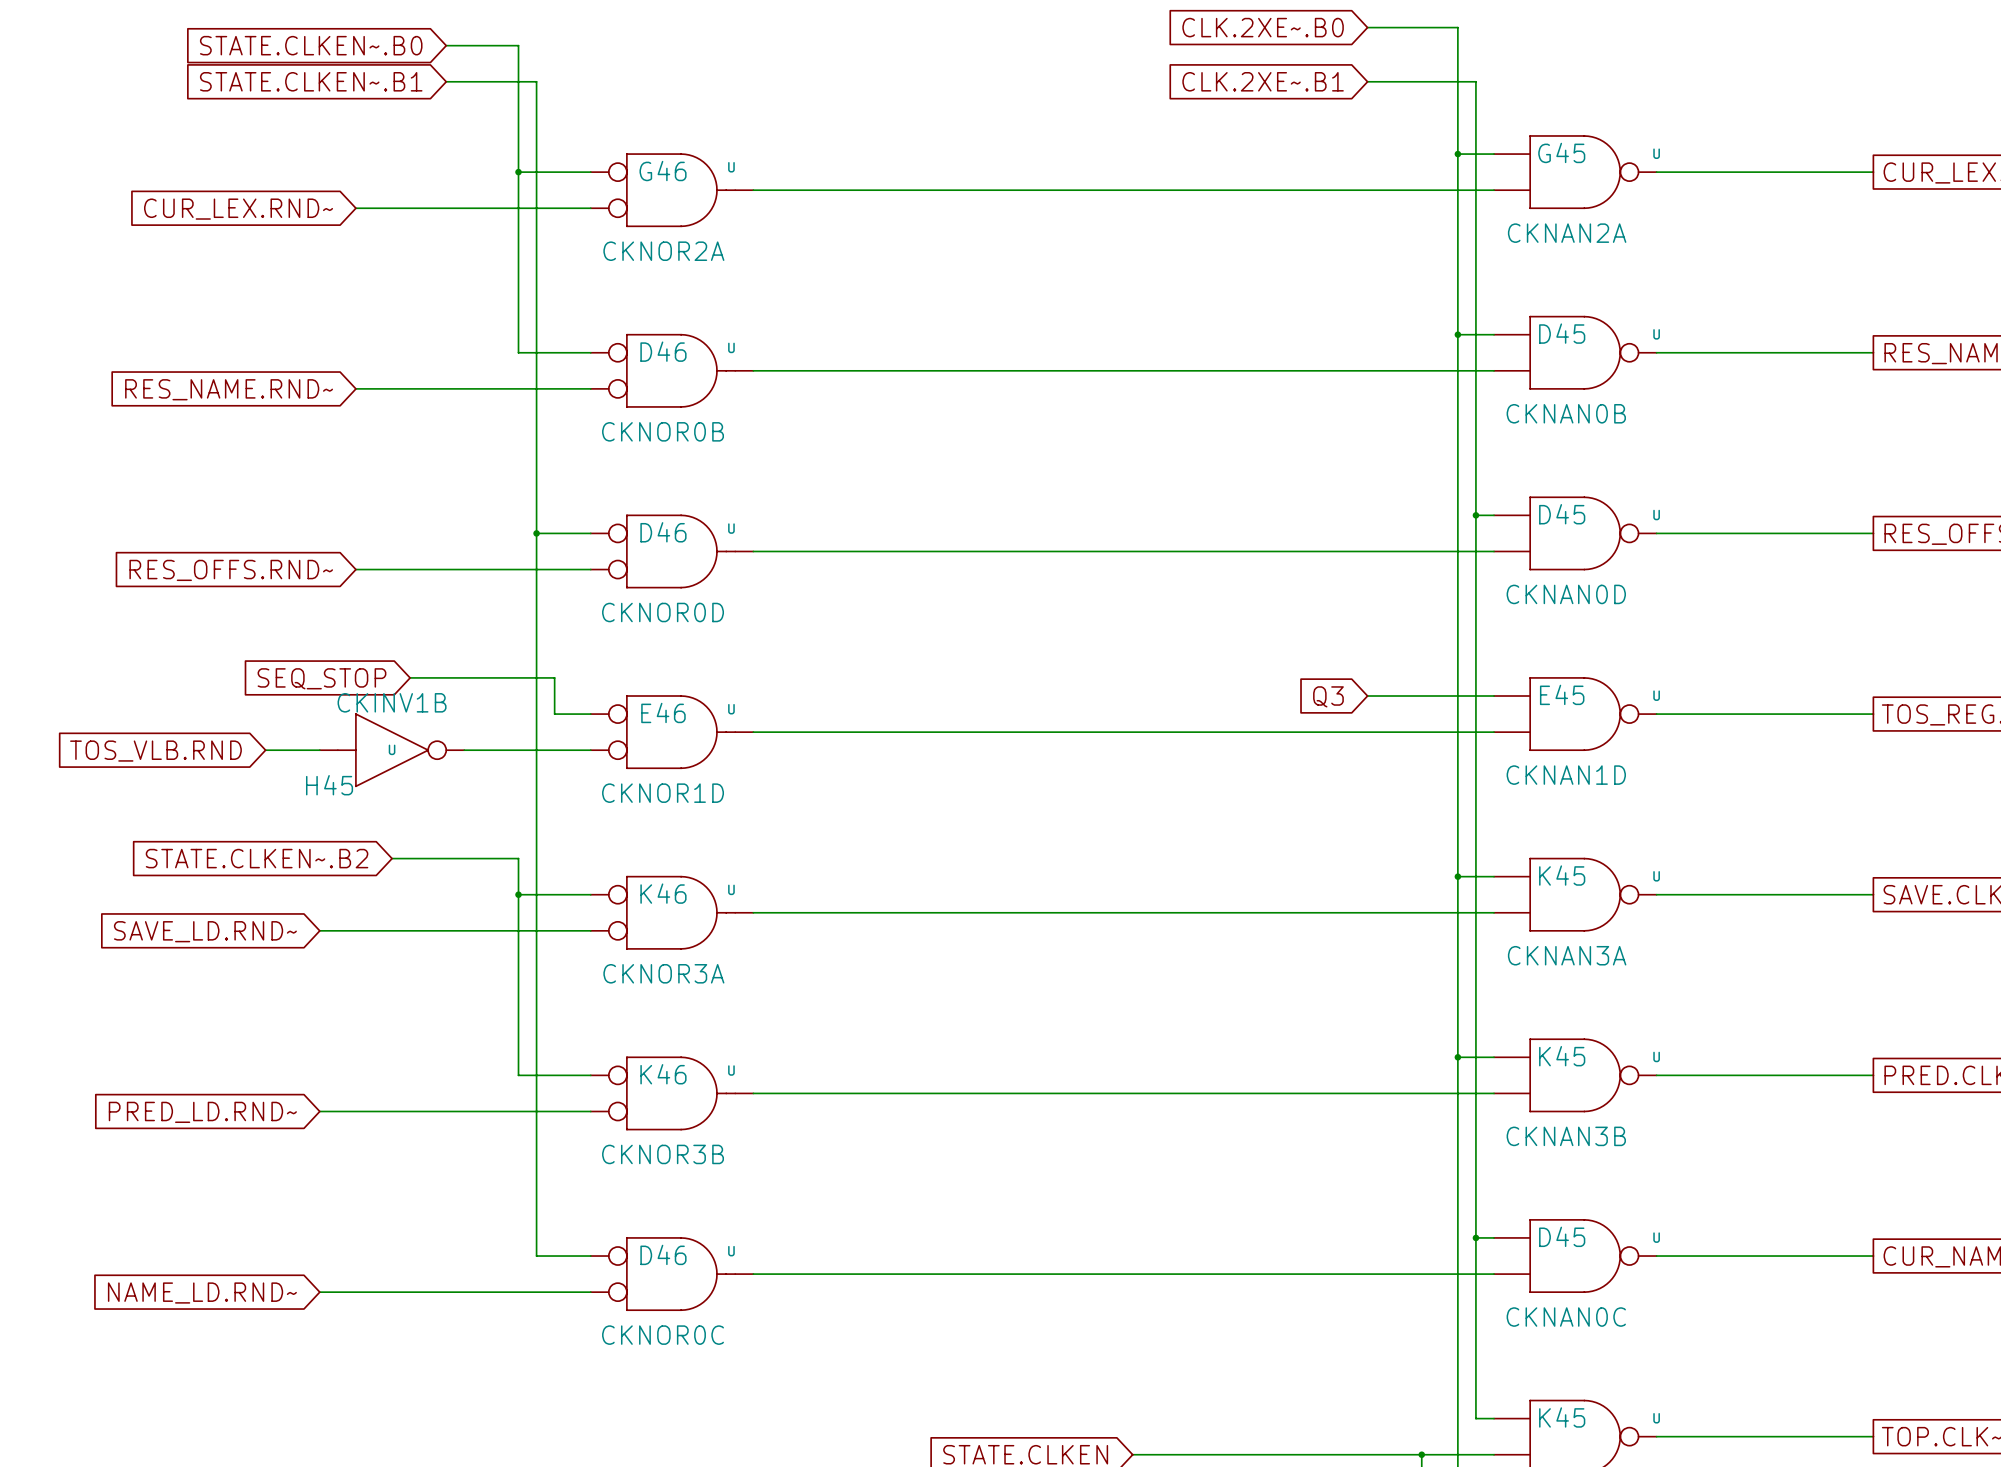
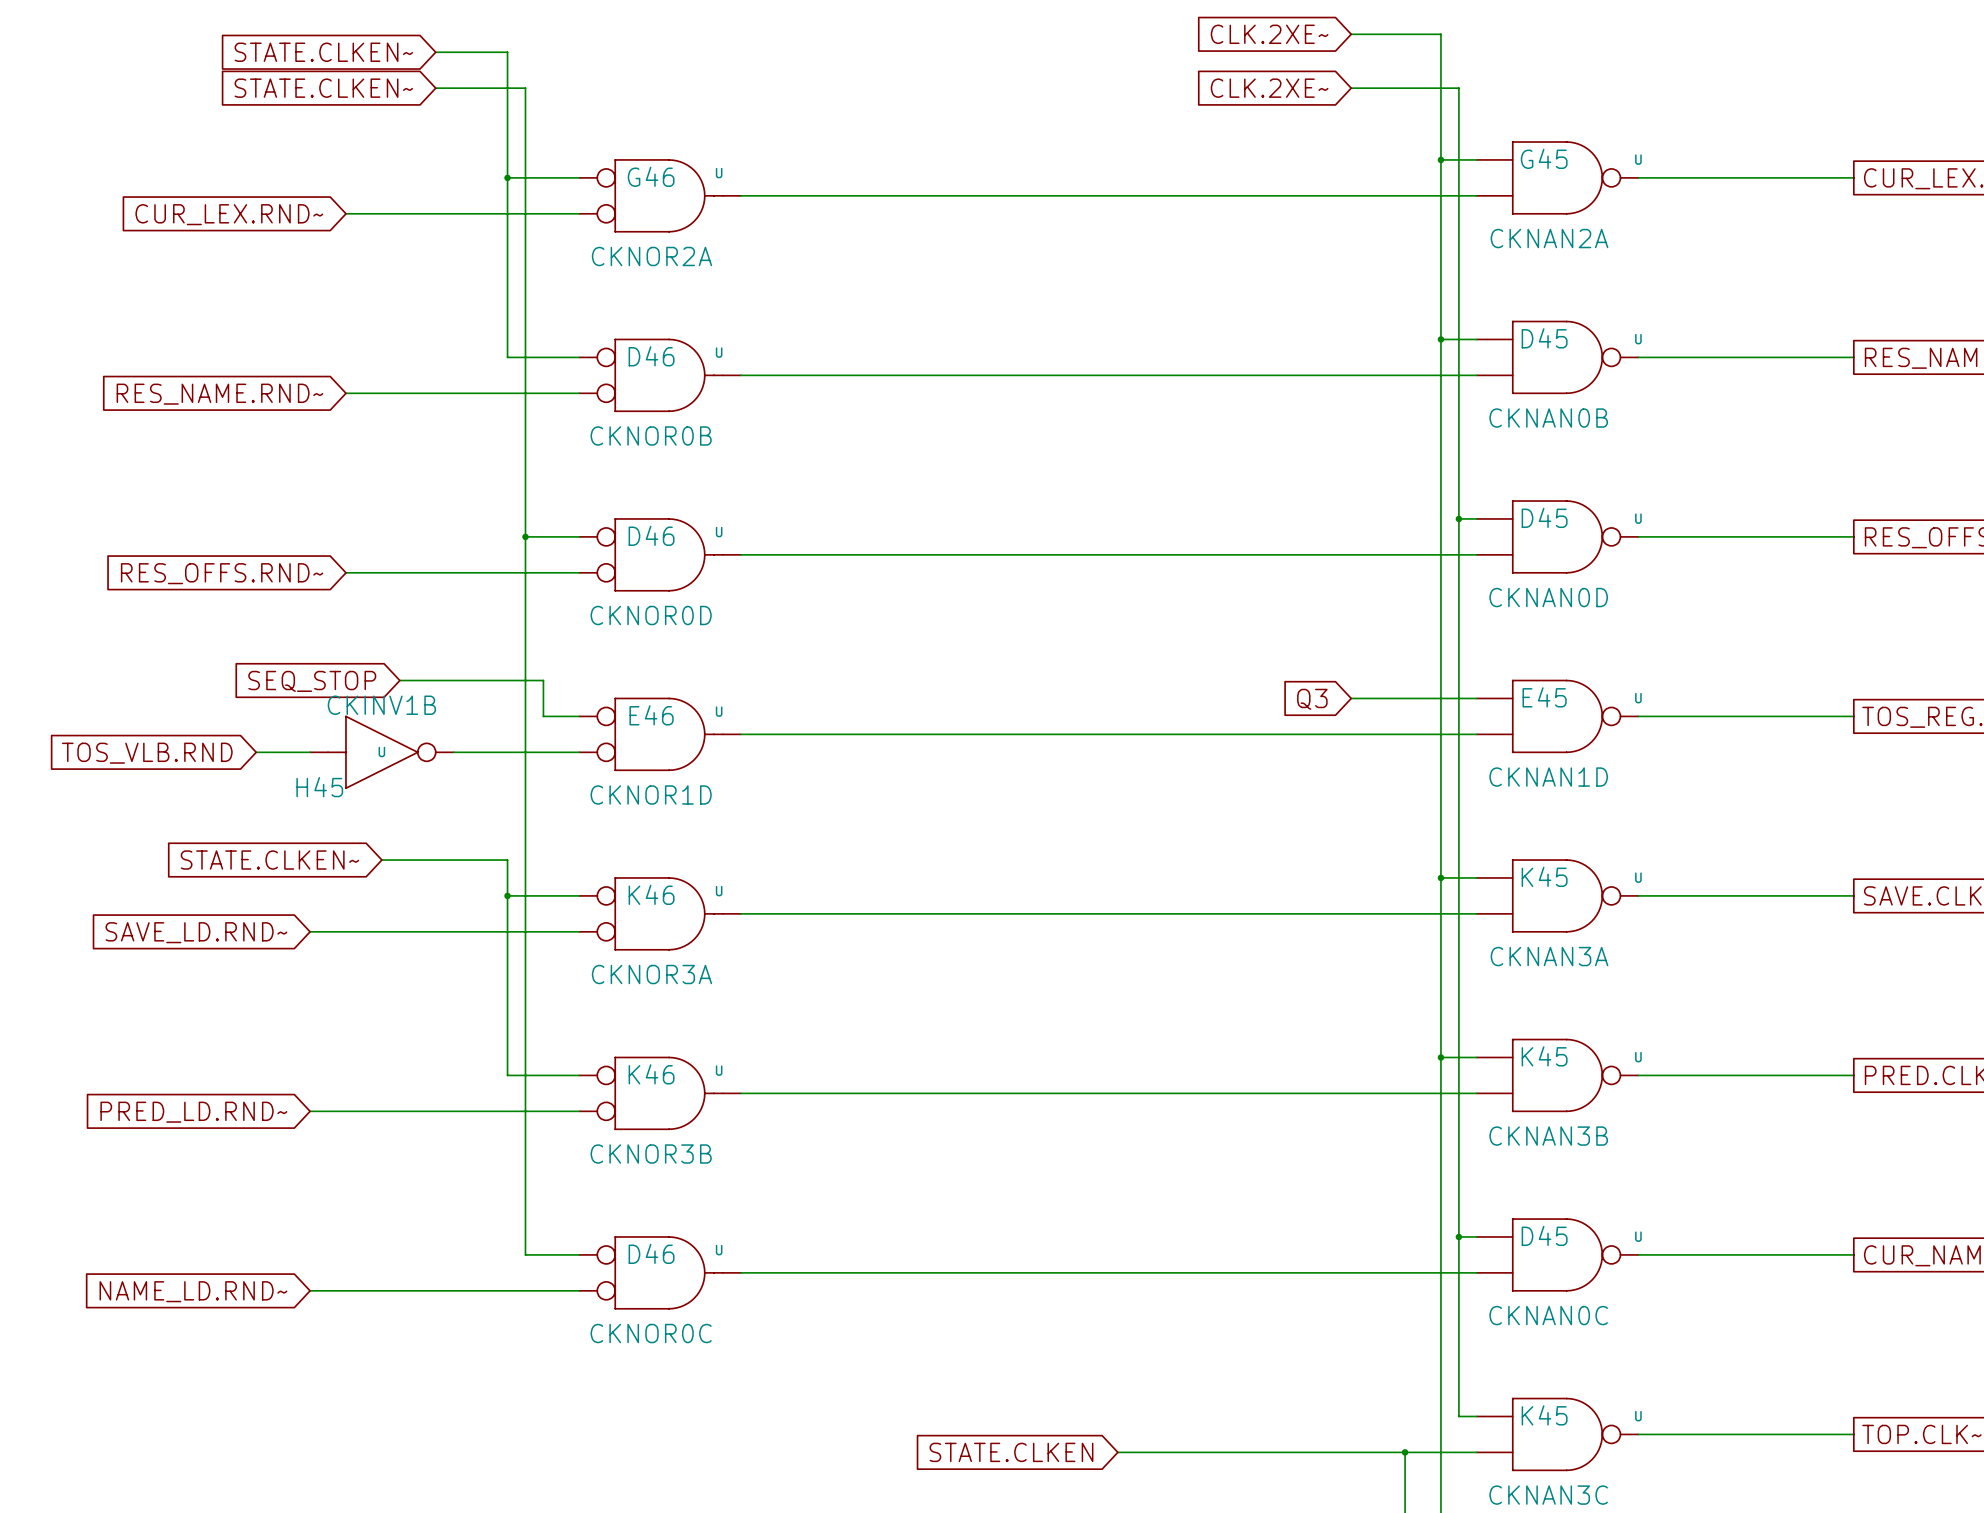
global label: CLK.2XE~.B0 (1263, 27) -> CLK.2XE~ (1269, 34)
global label: STATE.CLKEN~.B0 (311, 45) -> STATE.CLKEN~ (323, 52)
global label: STATE.CLKEN~.B1 (311, 81) -> STATE.CLKEN~ (323, 88)
global label: CLK.2XE~.B1 (1263, 81) -> CLK.2XE~ (1269, 88)
global label: STATE.CLKEN~.B2 (257, 858) -> STATE.CLKEN~ (269, 860)

